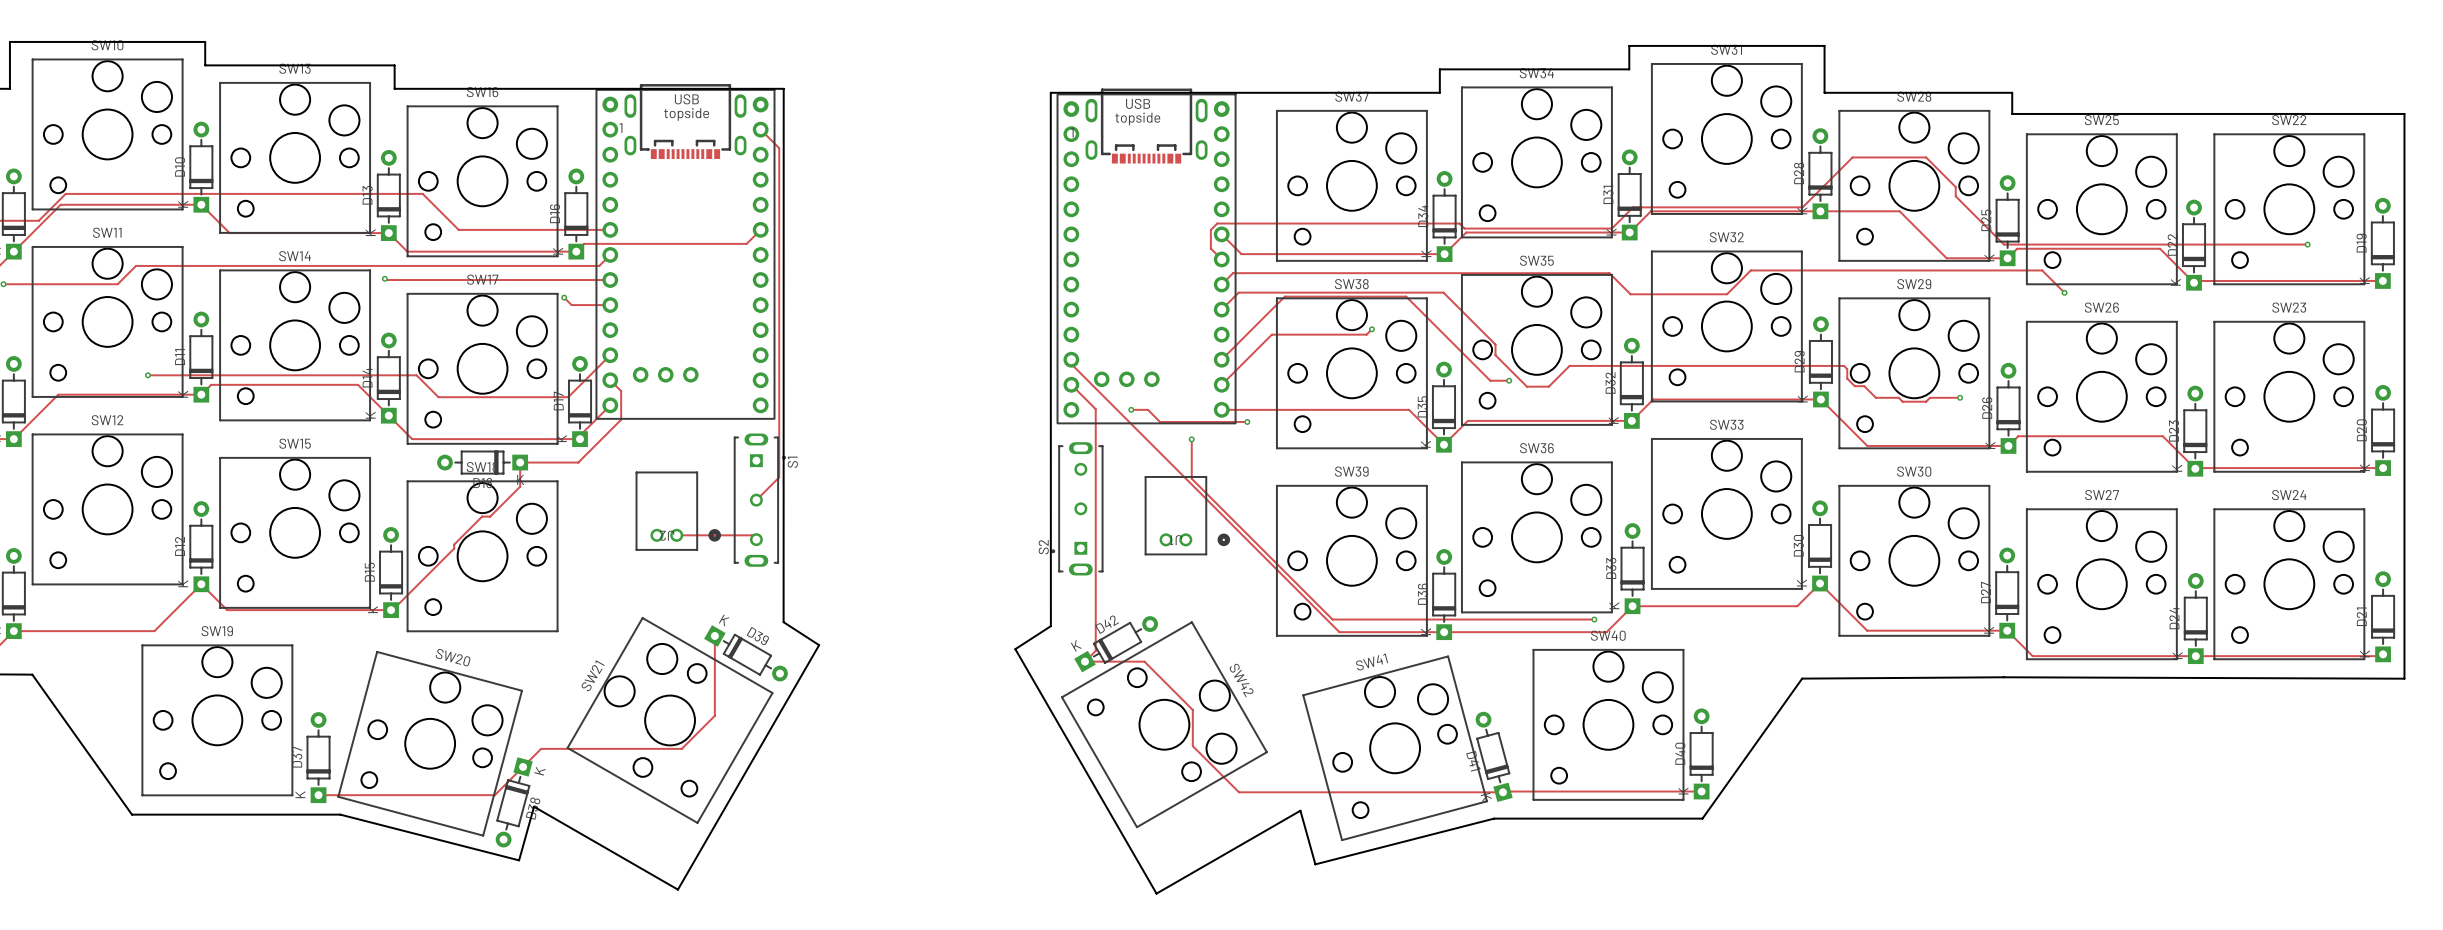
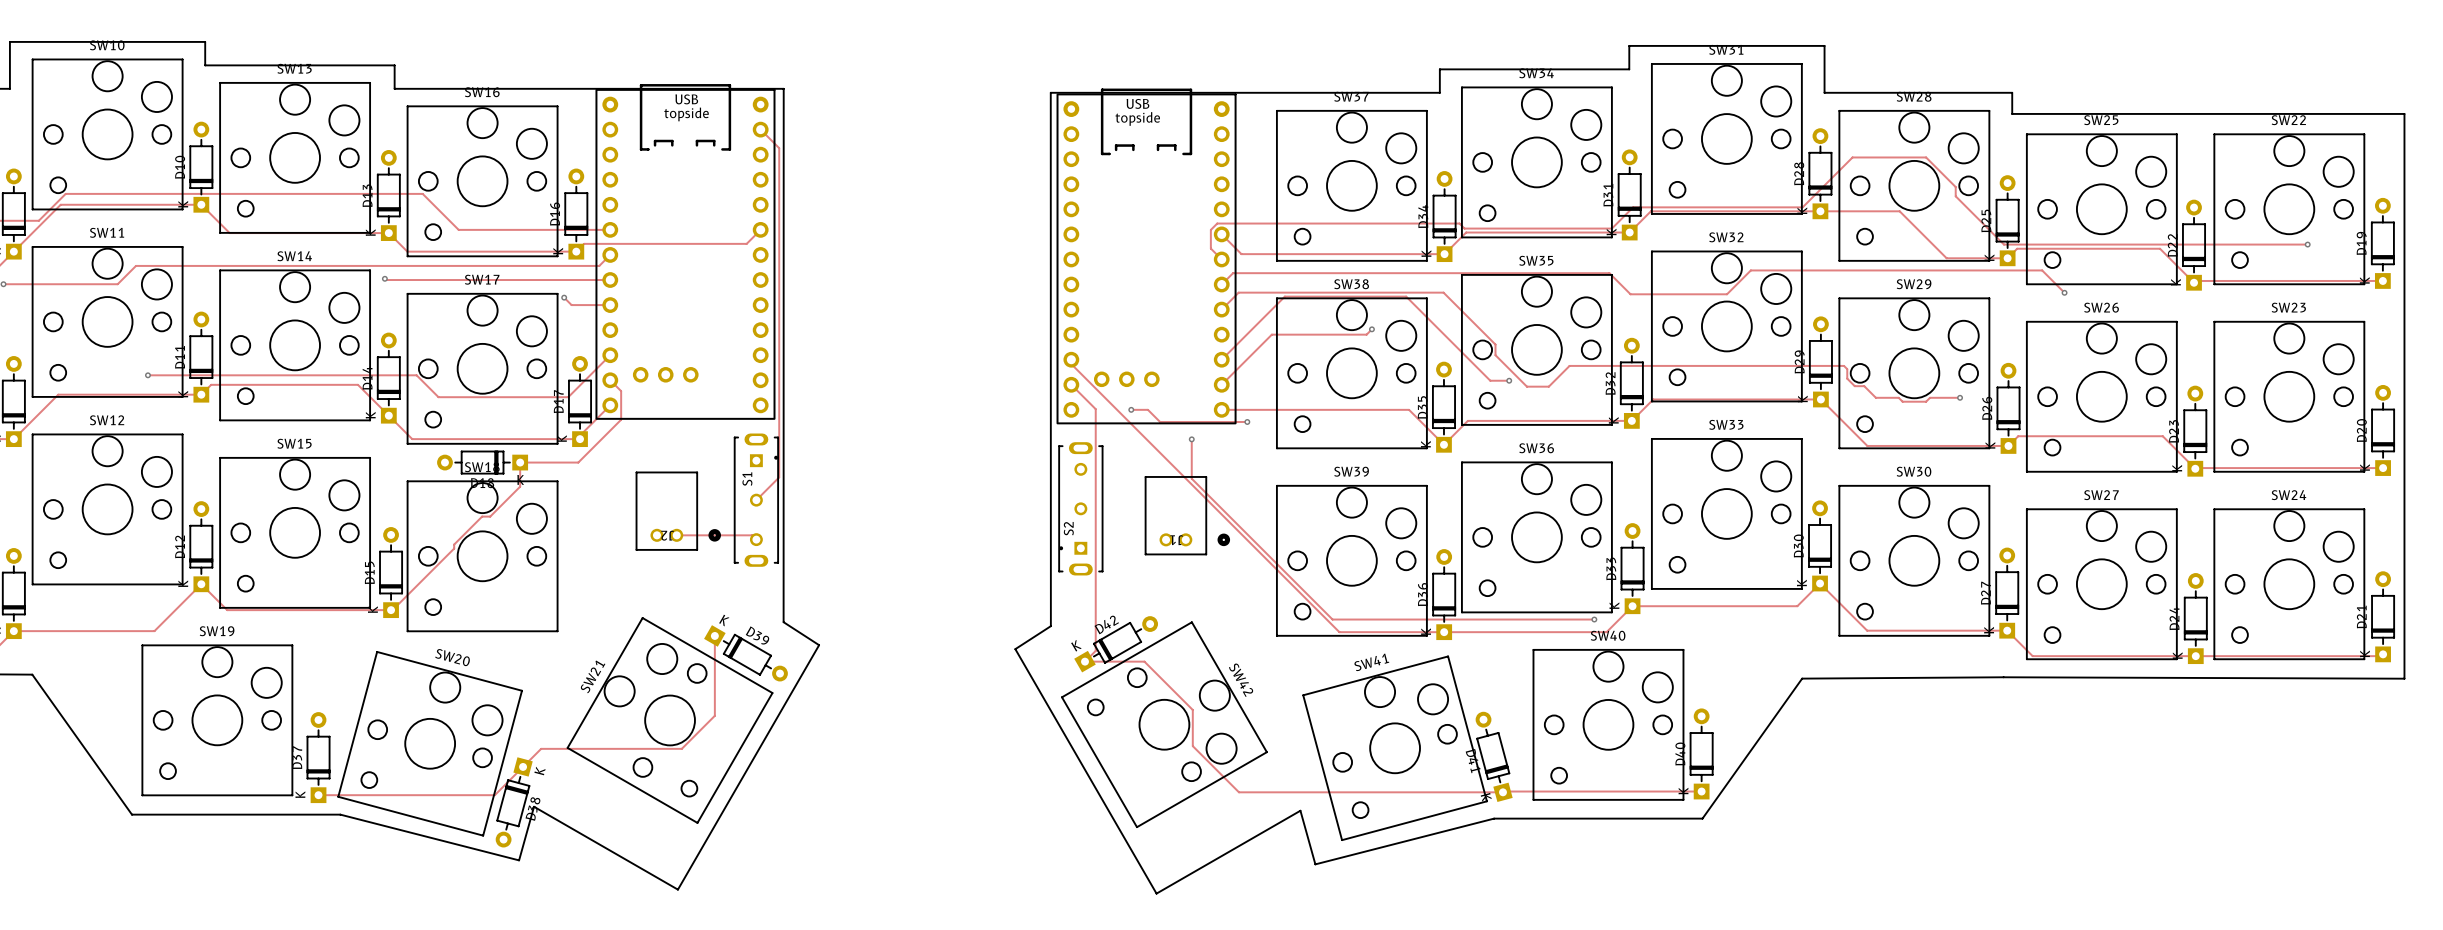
part footprint: [595, 84, 776, 420] -> [595, 84, 776, 420]
part footprint: [1056, 88, 1237, 425] -> [1056, 88, 1237, 425]
S1 footprint: [734, 433, 787, 567] -> [734, 433, 779, 567]
S2 footprint: [1051, 442, 1104, 576] -> [1058, 442, 1104, 576]
S1 name position: S1 (792, 462) -> S1 (747, 479)
S2 name position: S2 (1043, 547) -> S2 (1068, 528)

